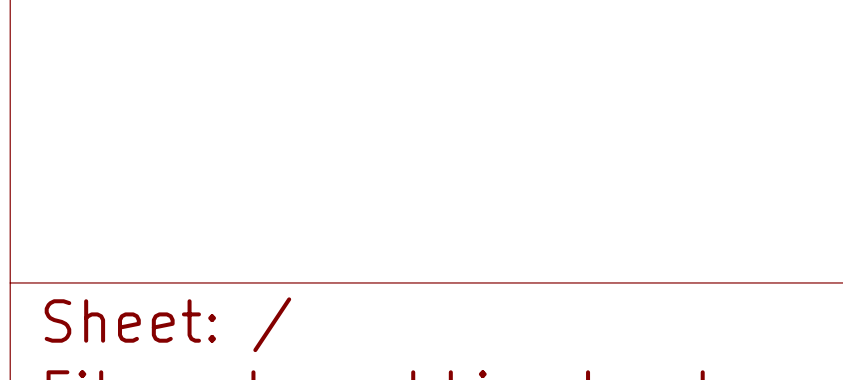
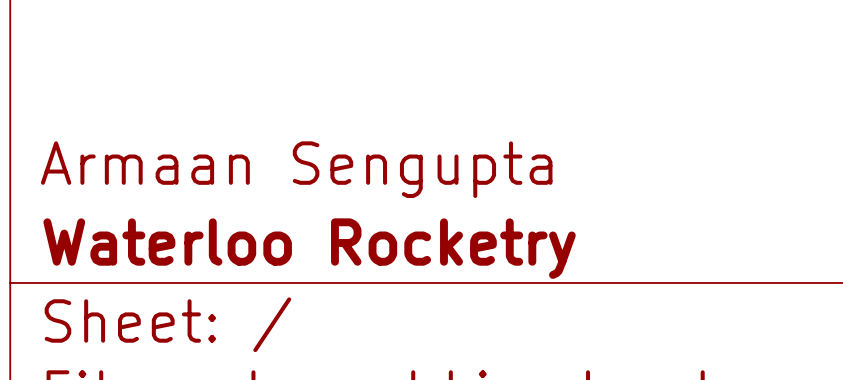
title block: none -> Armaan Sengupta (296, 169)
title block: none -> Waterloo Rocketry (309, 248)

